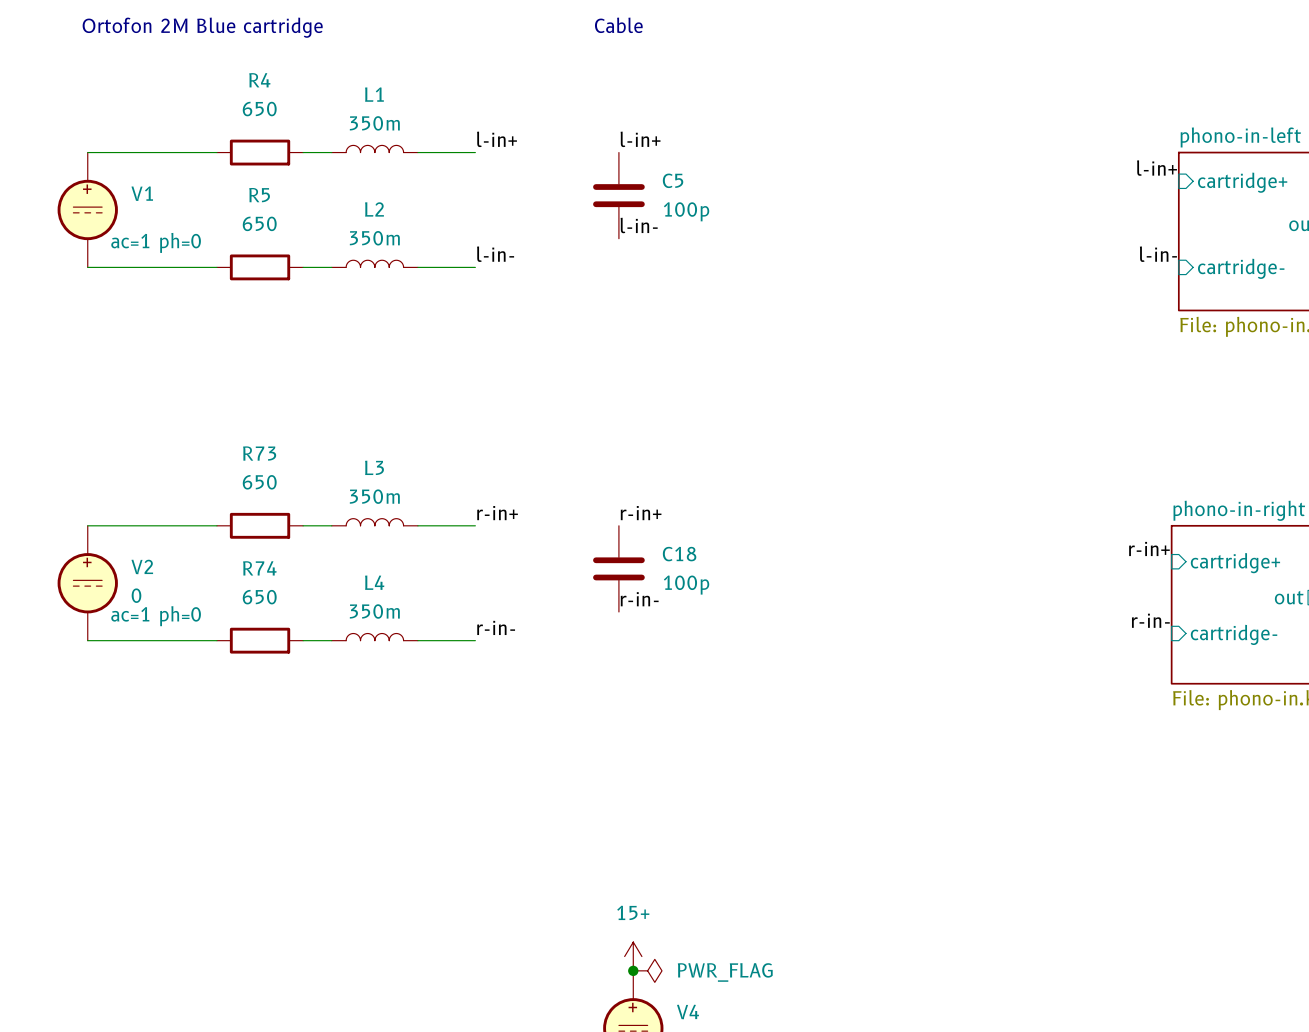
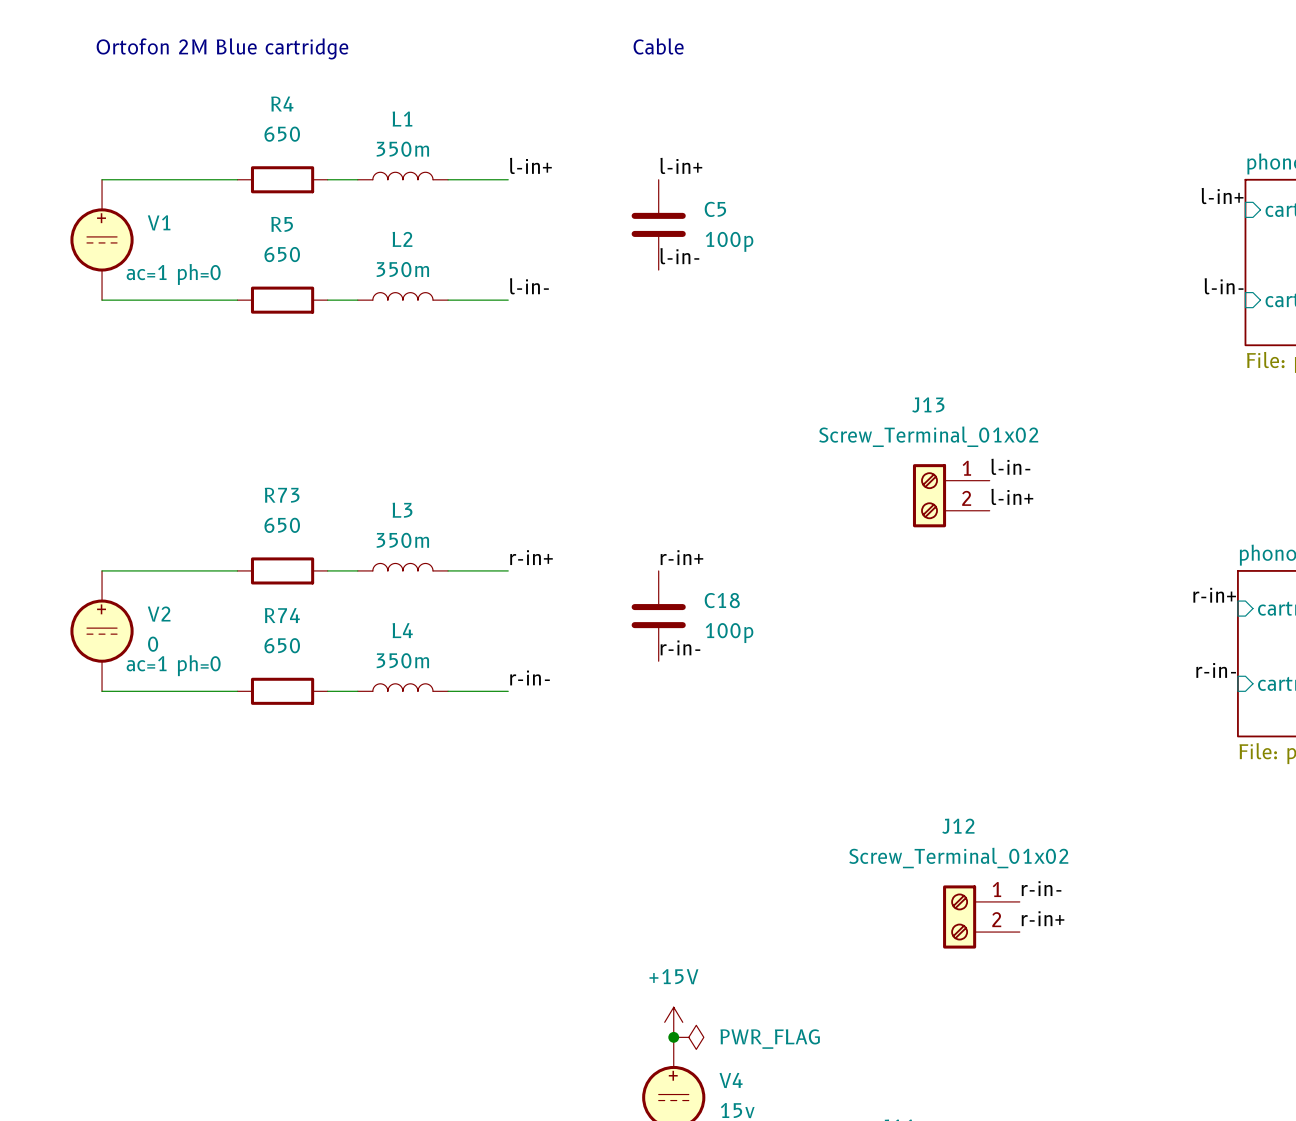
label: none -> l-in- (1010, 466)
J13: none -> Screw_Terminal_01x02 (951, 495)
label: none -> l-in+ (1012, 496)
label: none -> r-in- (1041, 888)
J12: none -> Screw_Terminal_01x02 (981, 916)
label: none -> r-in+ (1043, 918)
power symbol: 15+ (633, 956) -> +15V (673, 1022)

